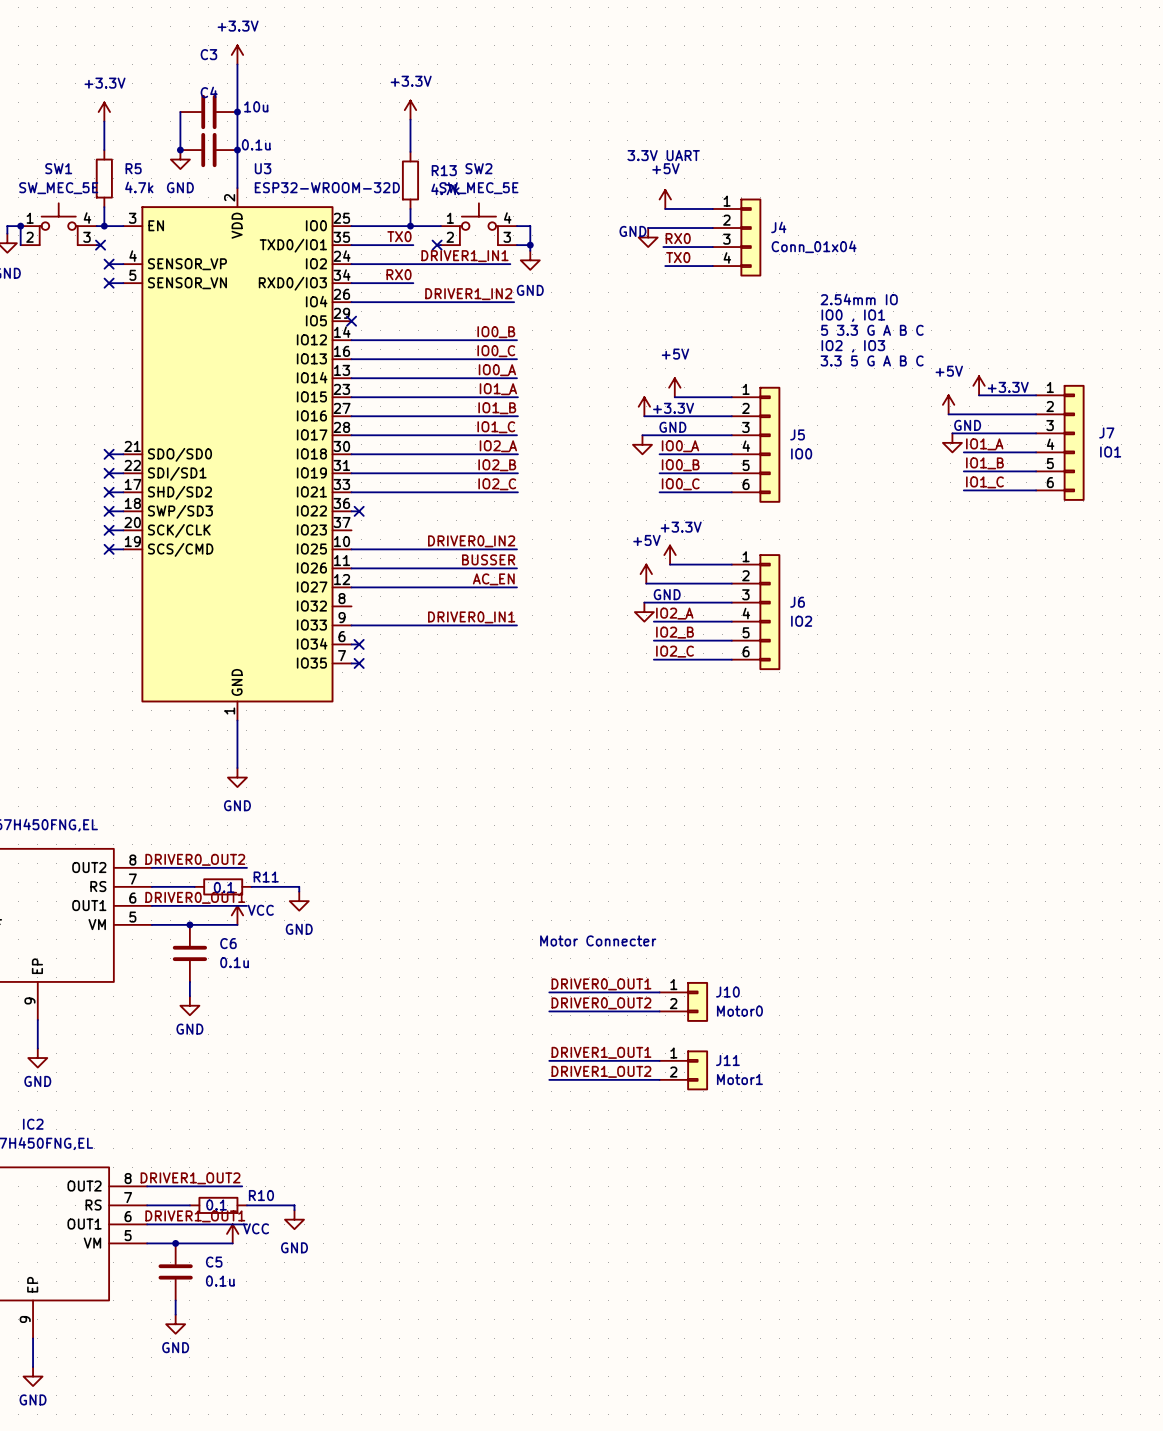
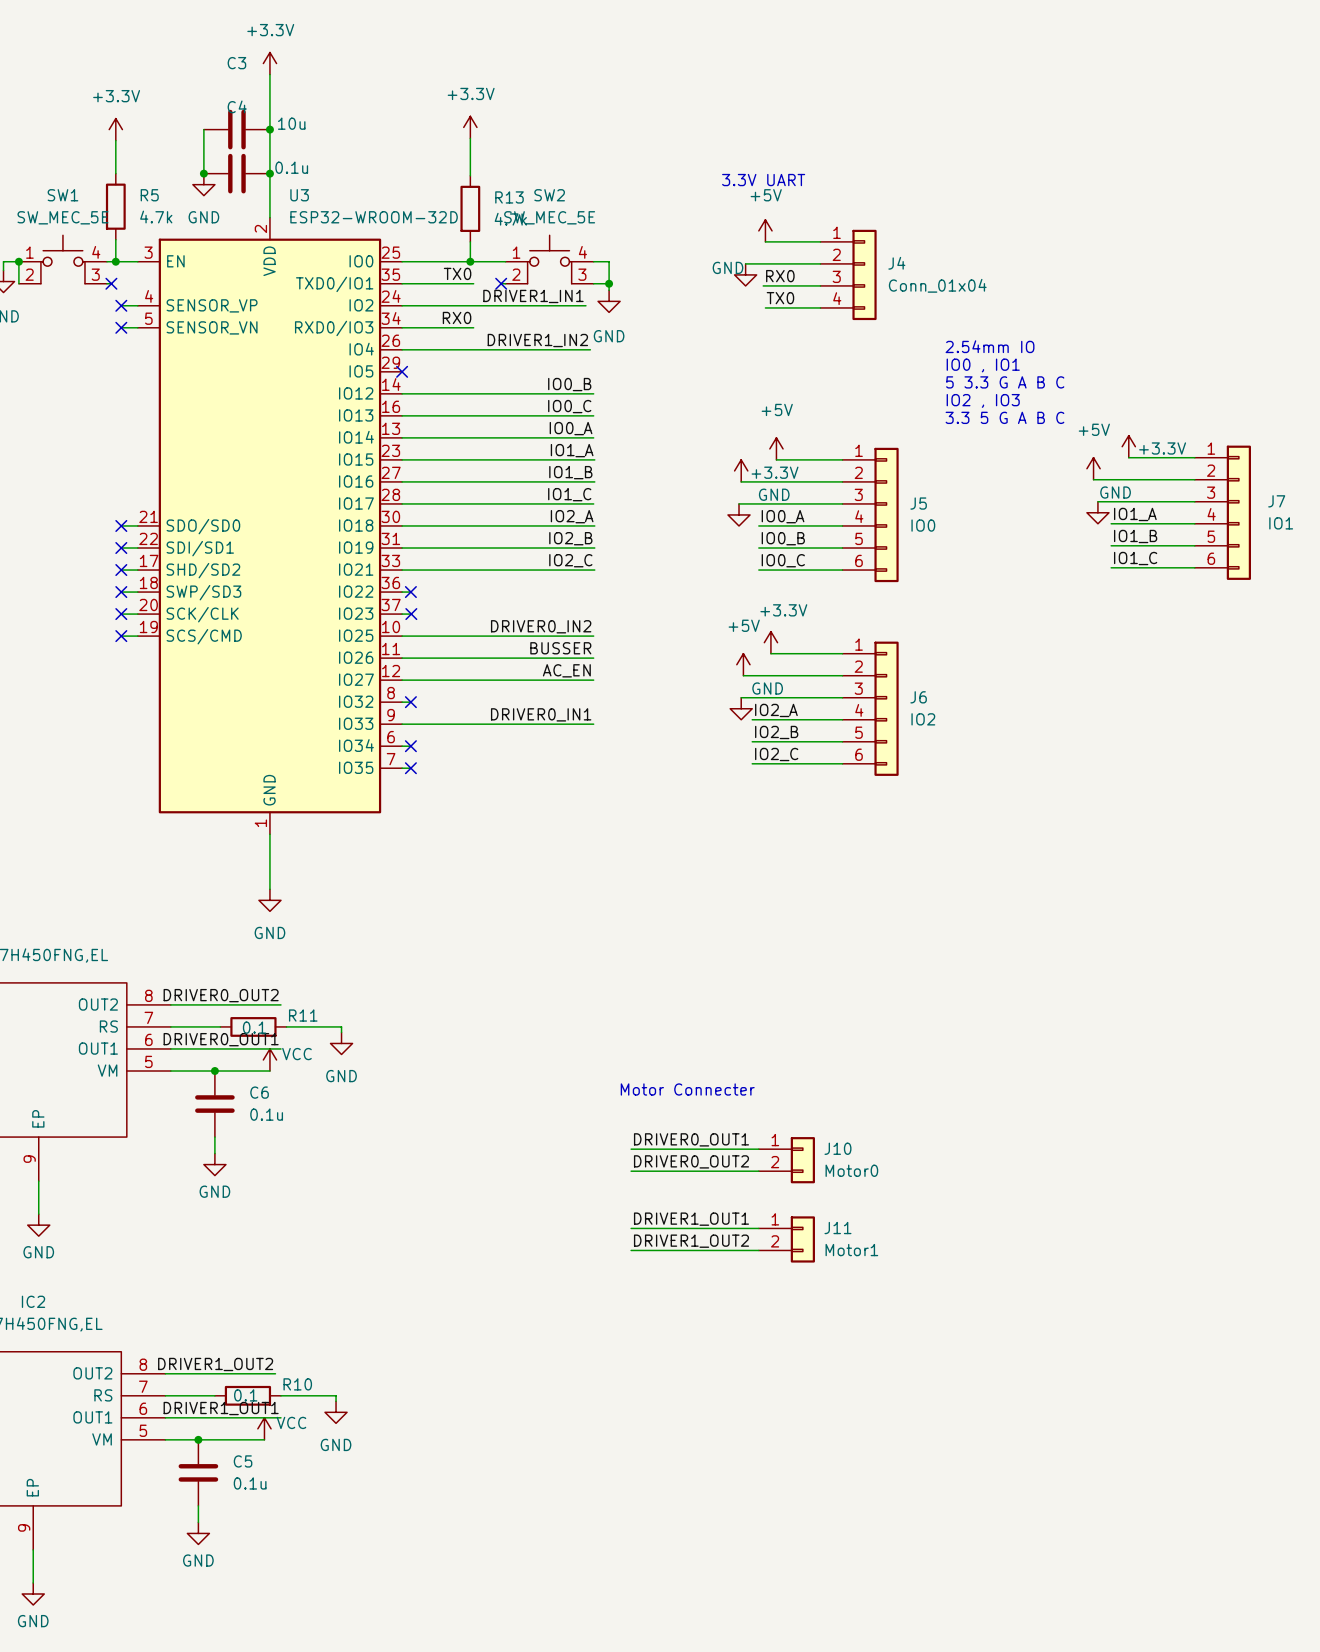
wire: none -> (402, 614) (411, 614)
no-connect mark: none -> (411, 614)
wire: none -> (402, 702) (410, 702)
no-connect mark: none -> (410, 702)

